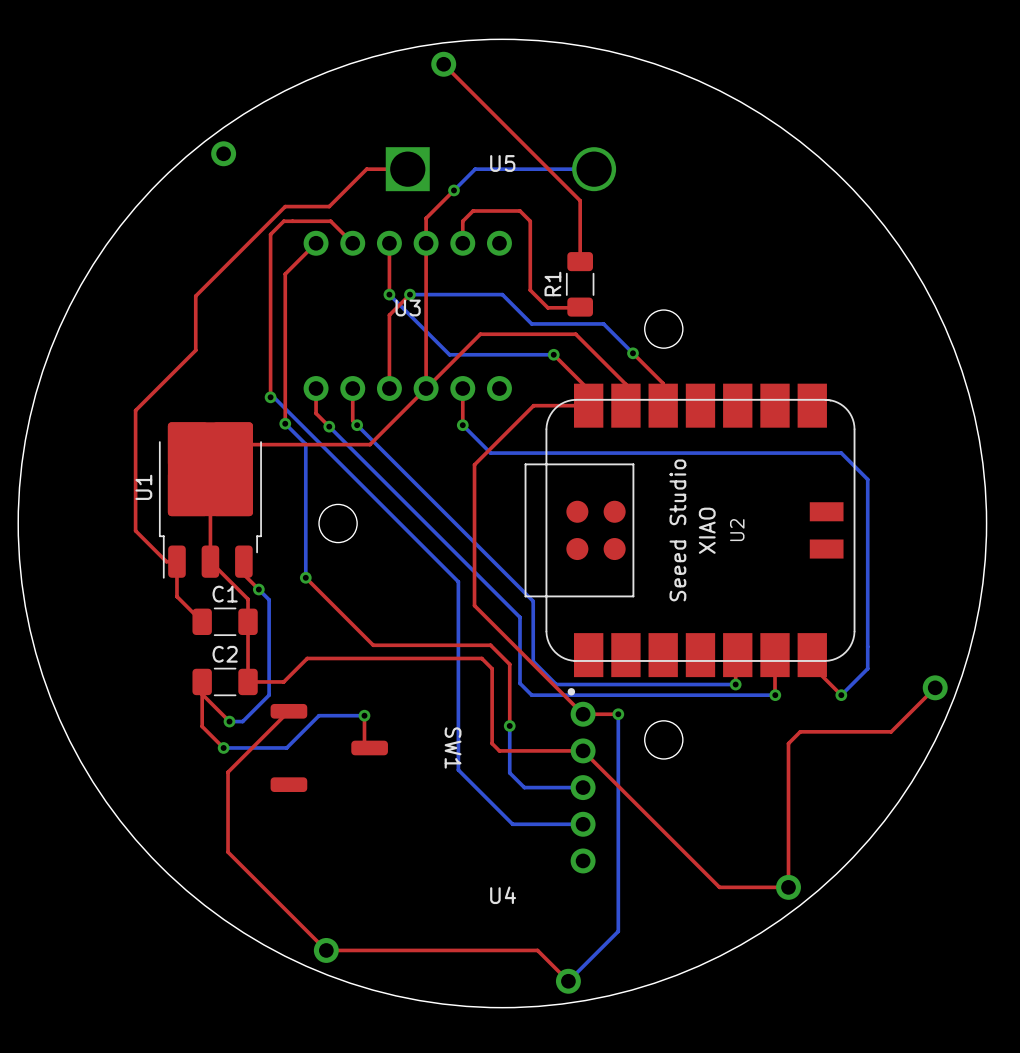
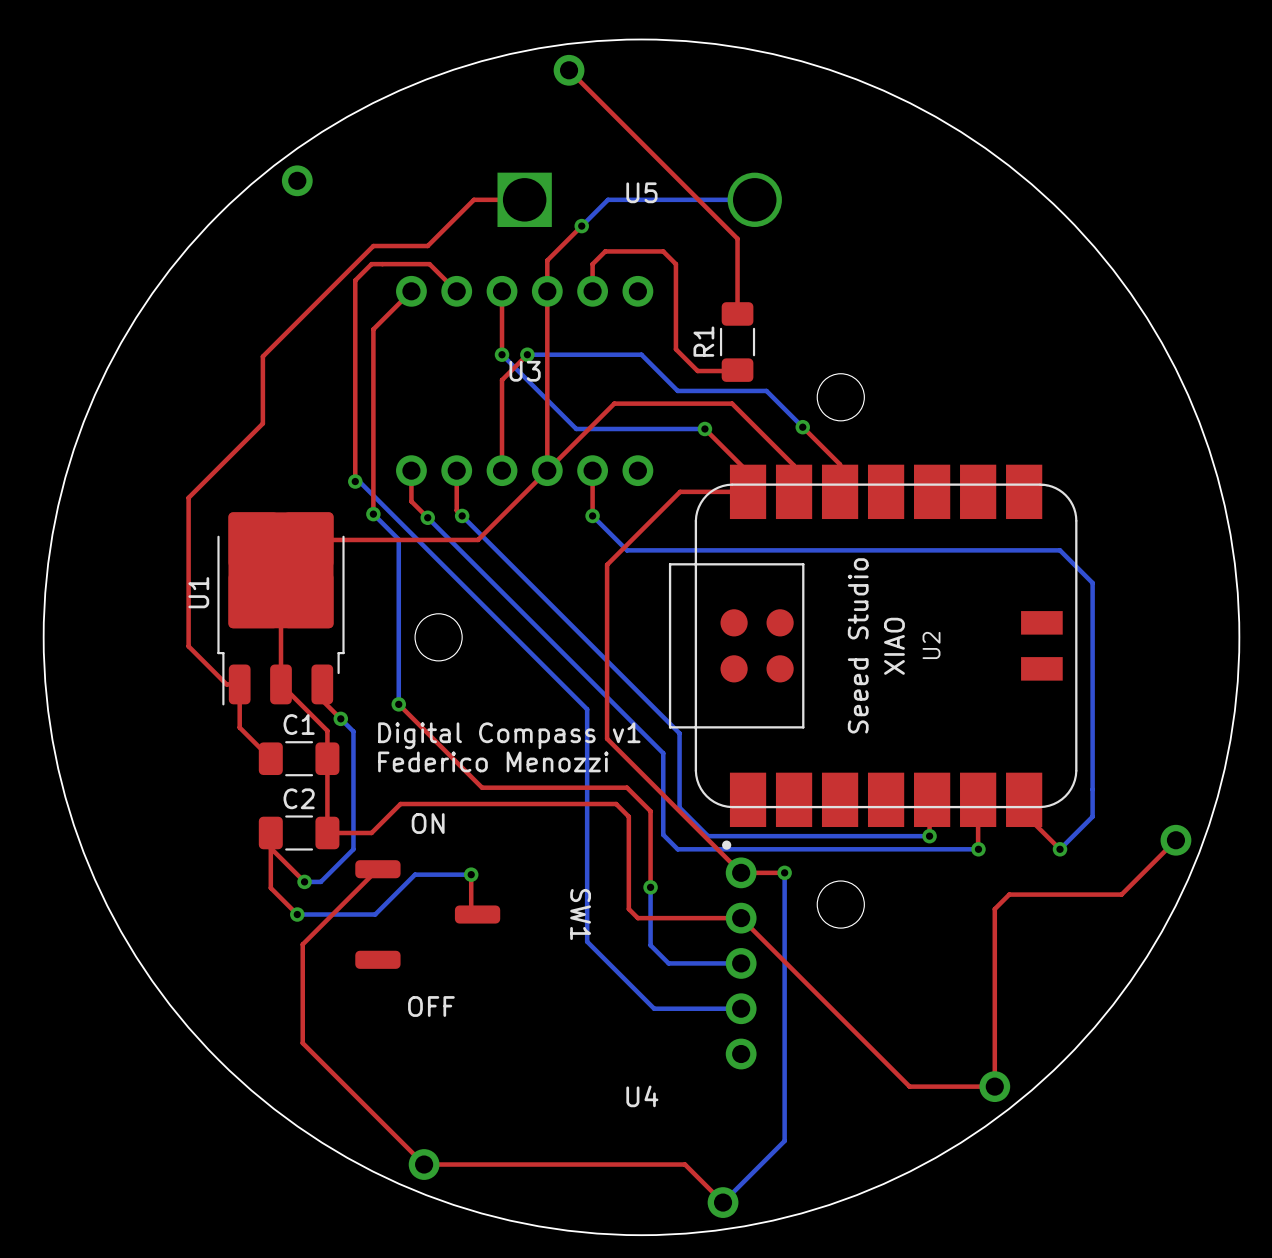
text: none -> Digital Compass v1 (509, 735)
text: none -> Federico Menozzi (493, 761)
text: none -> ON (428, 823)
text: none -> OFF (431, 1006)

